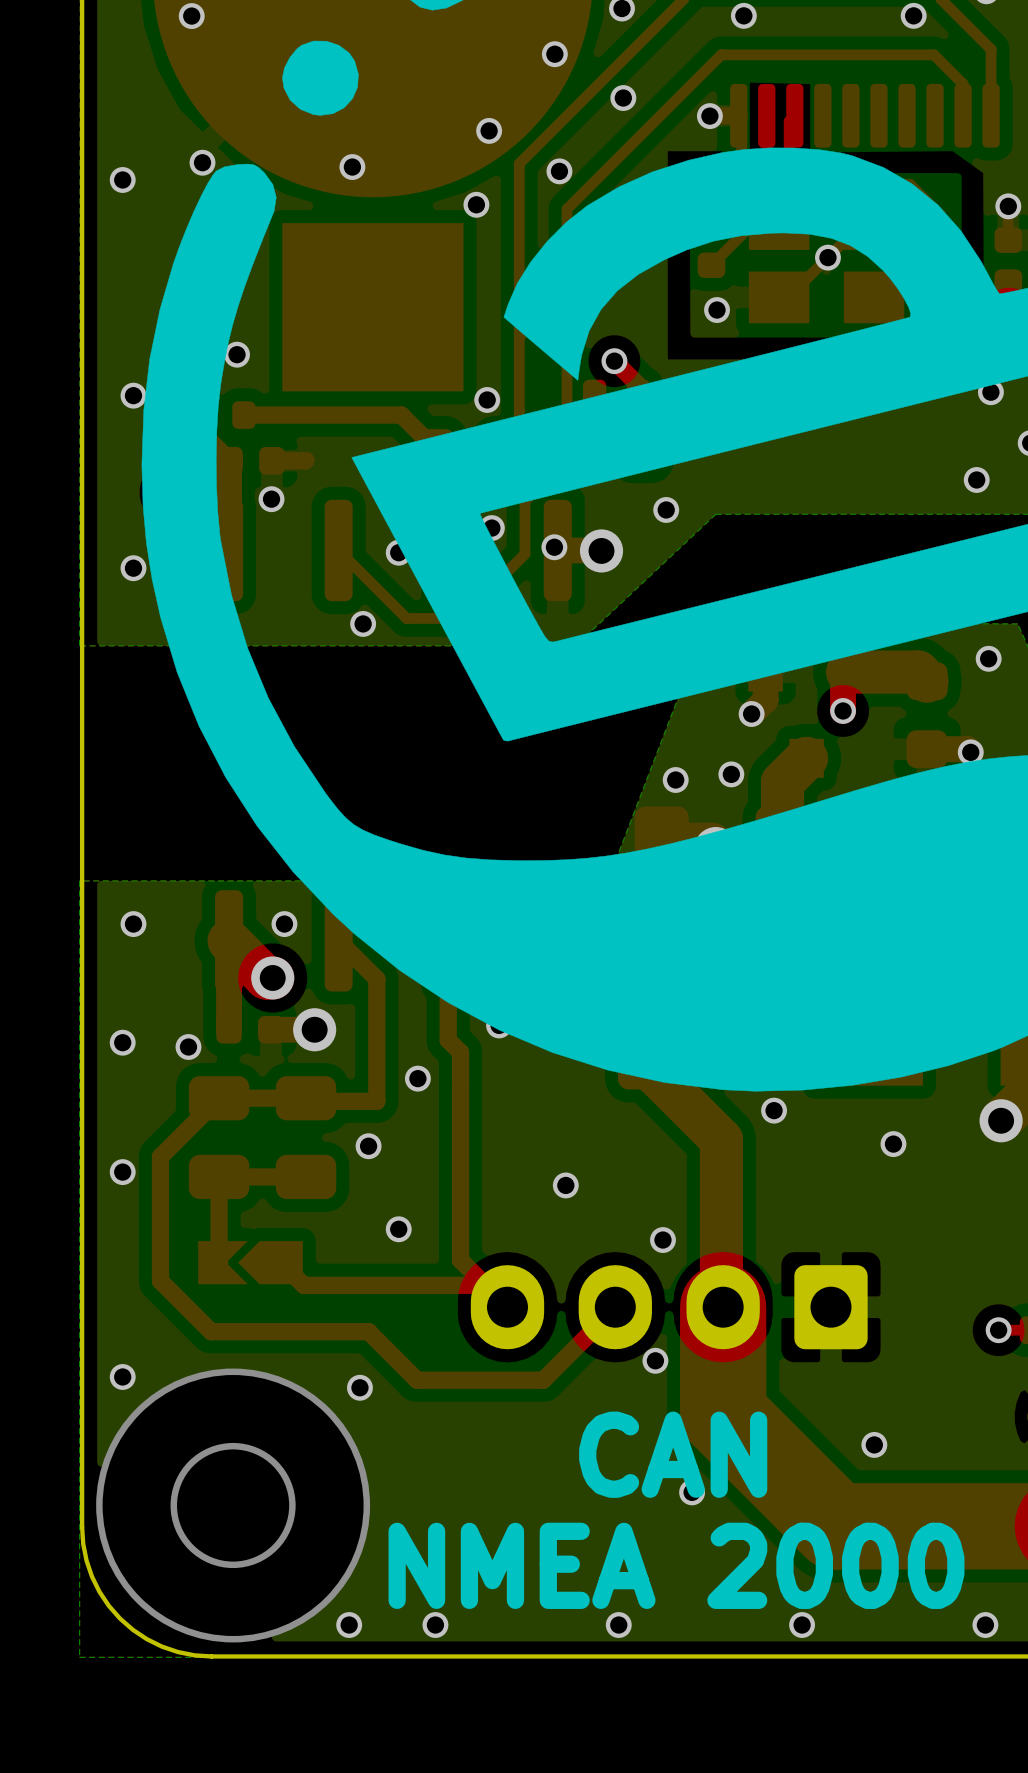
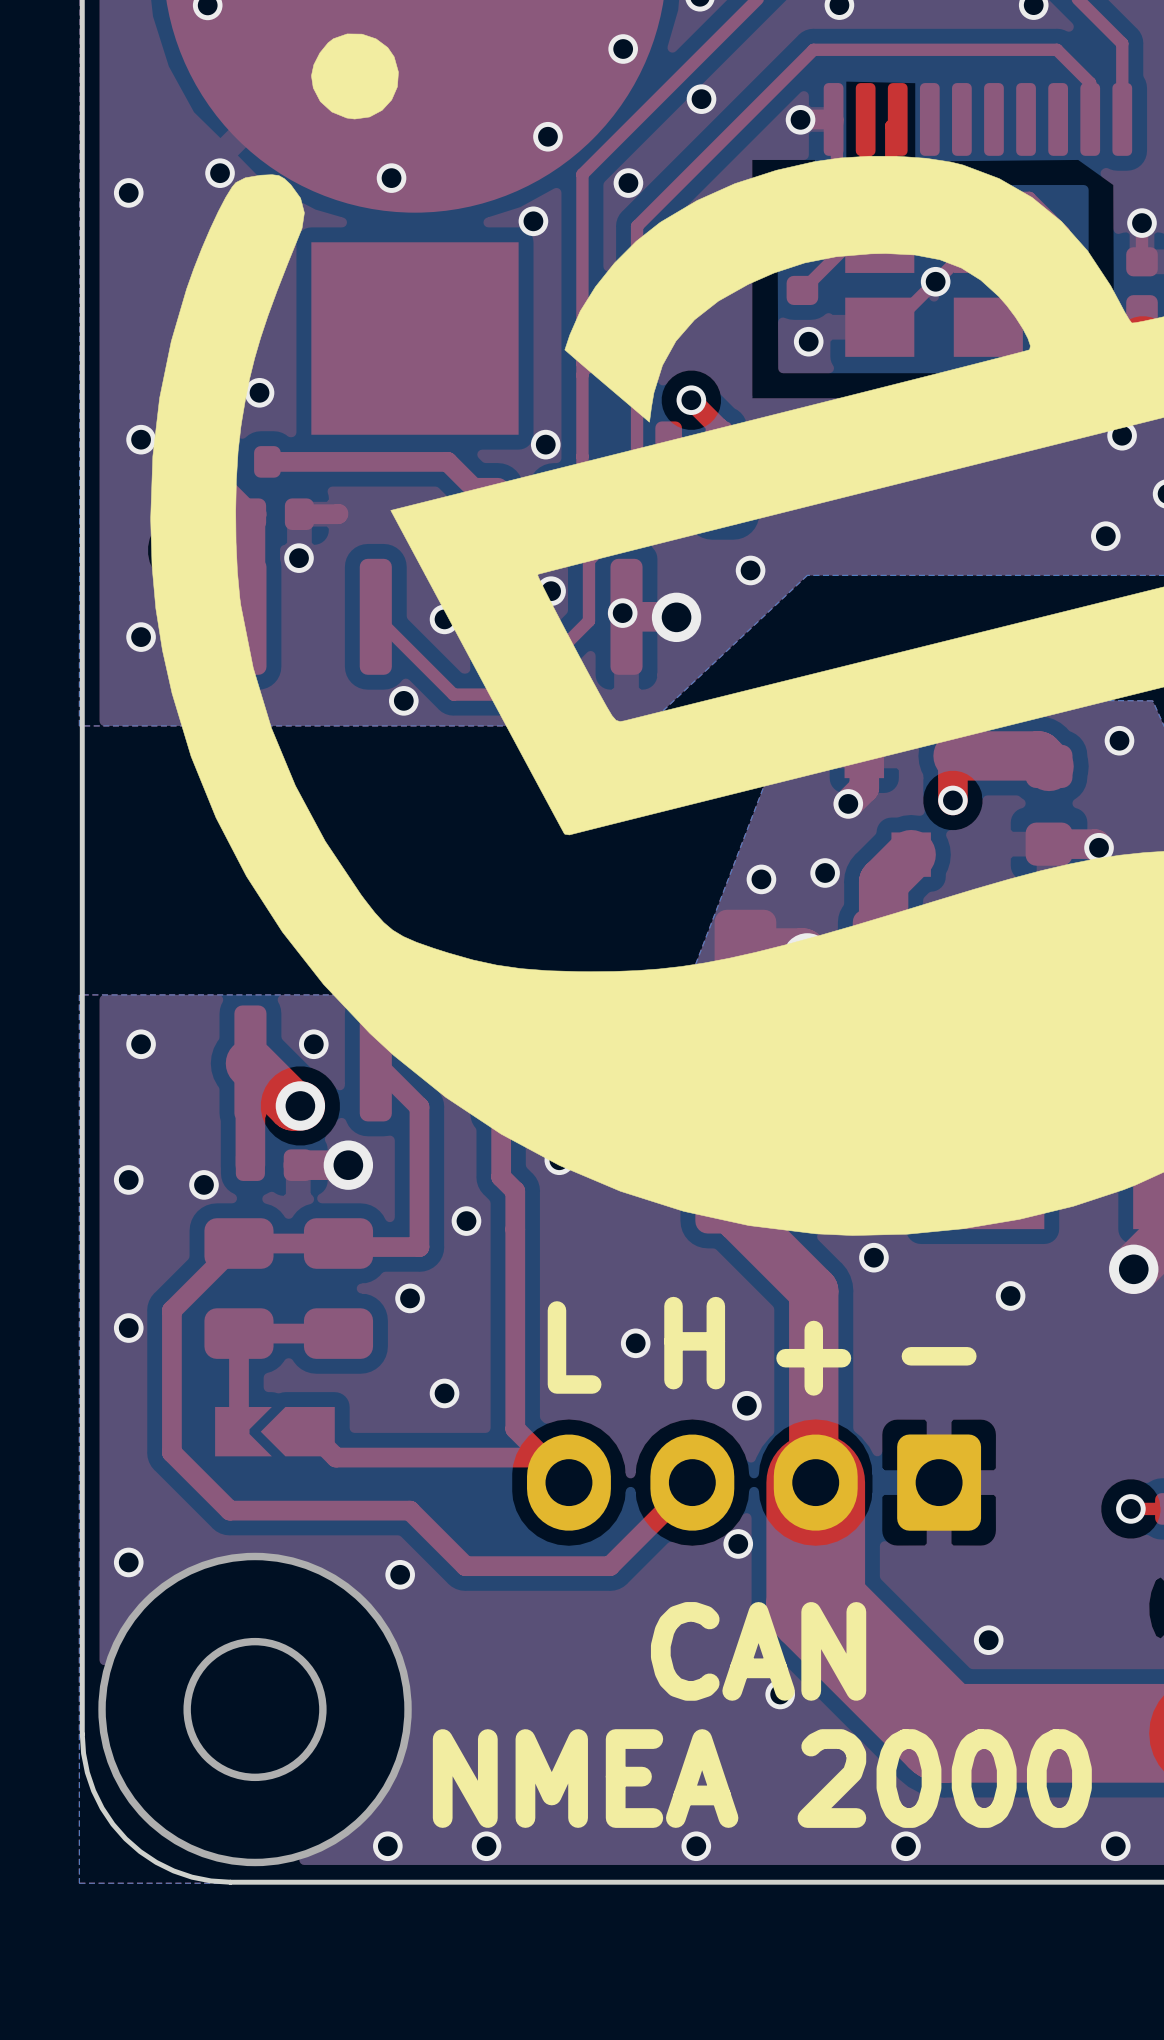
text: none -> H (694, 1343)
text: none -> L (574, 1347)
text: none -> - (939, 1356)
text: none -> + (813, 1358)

